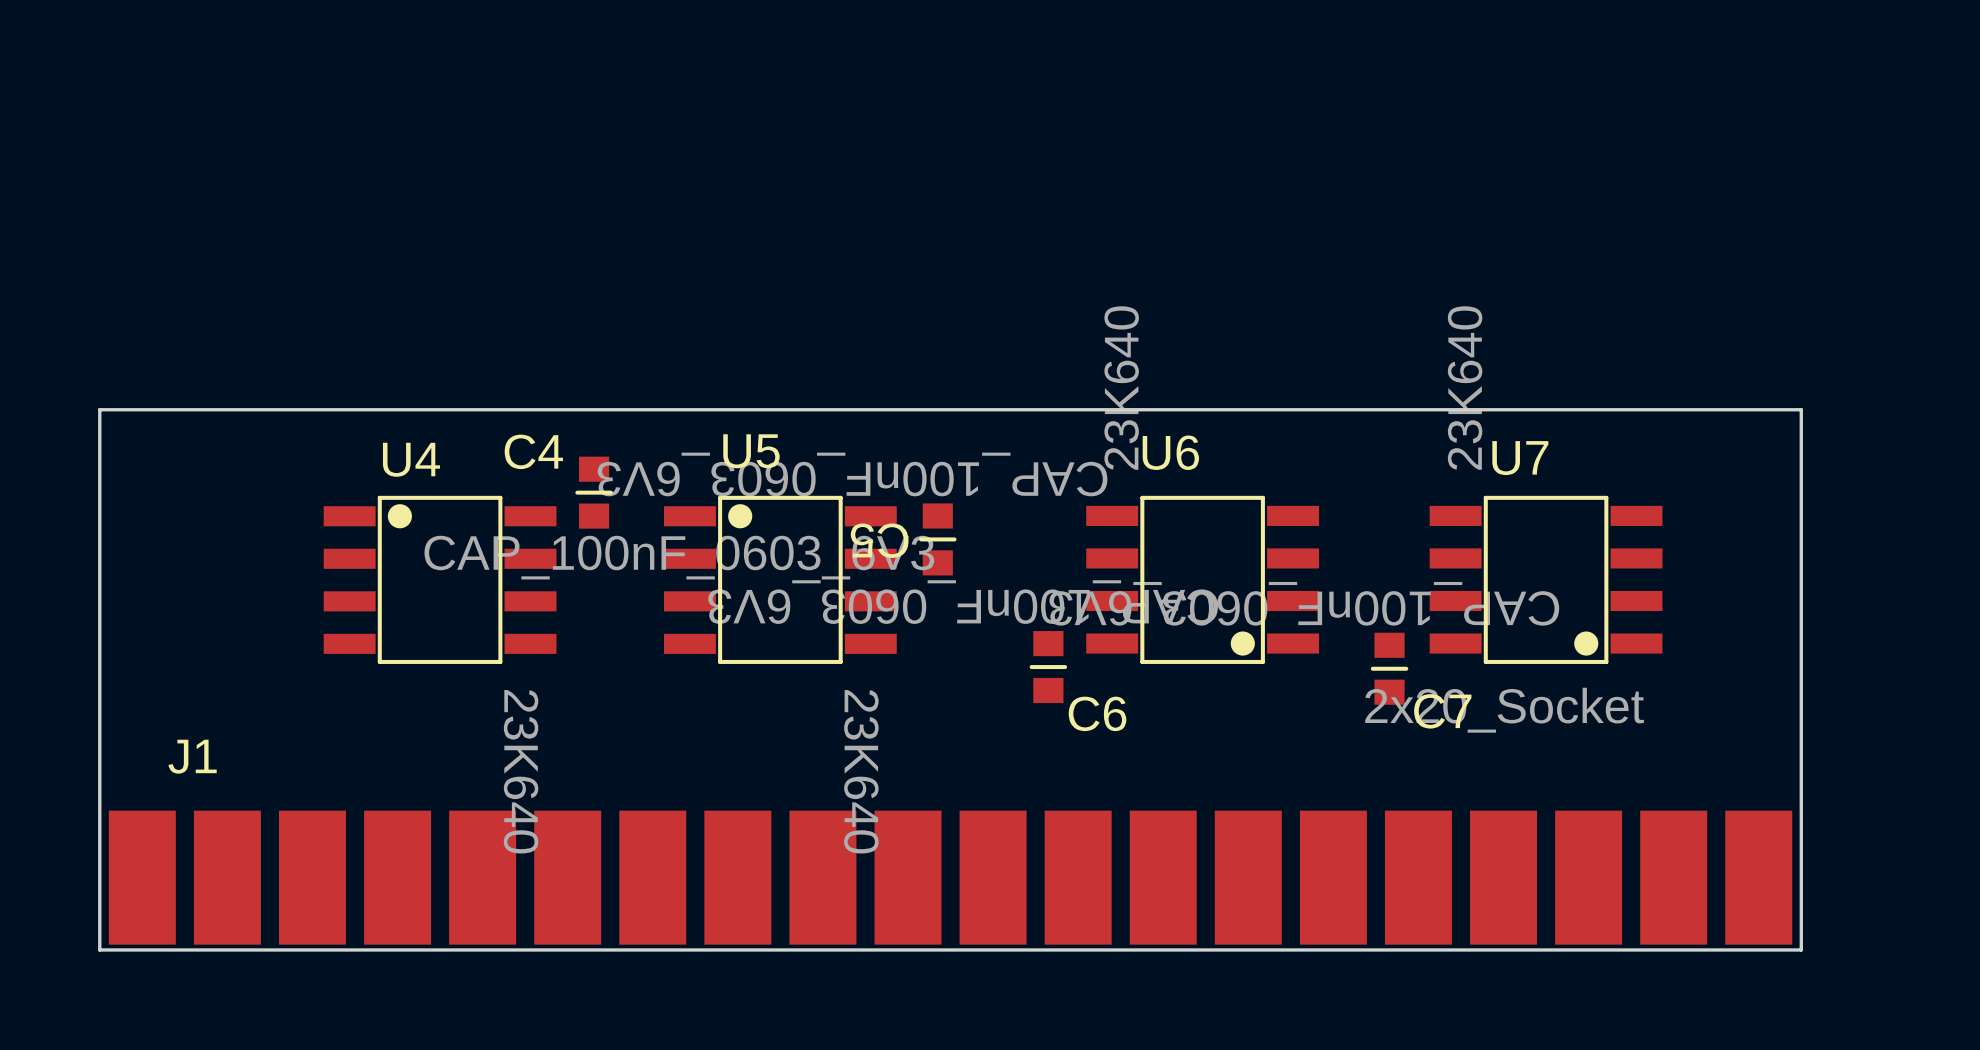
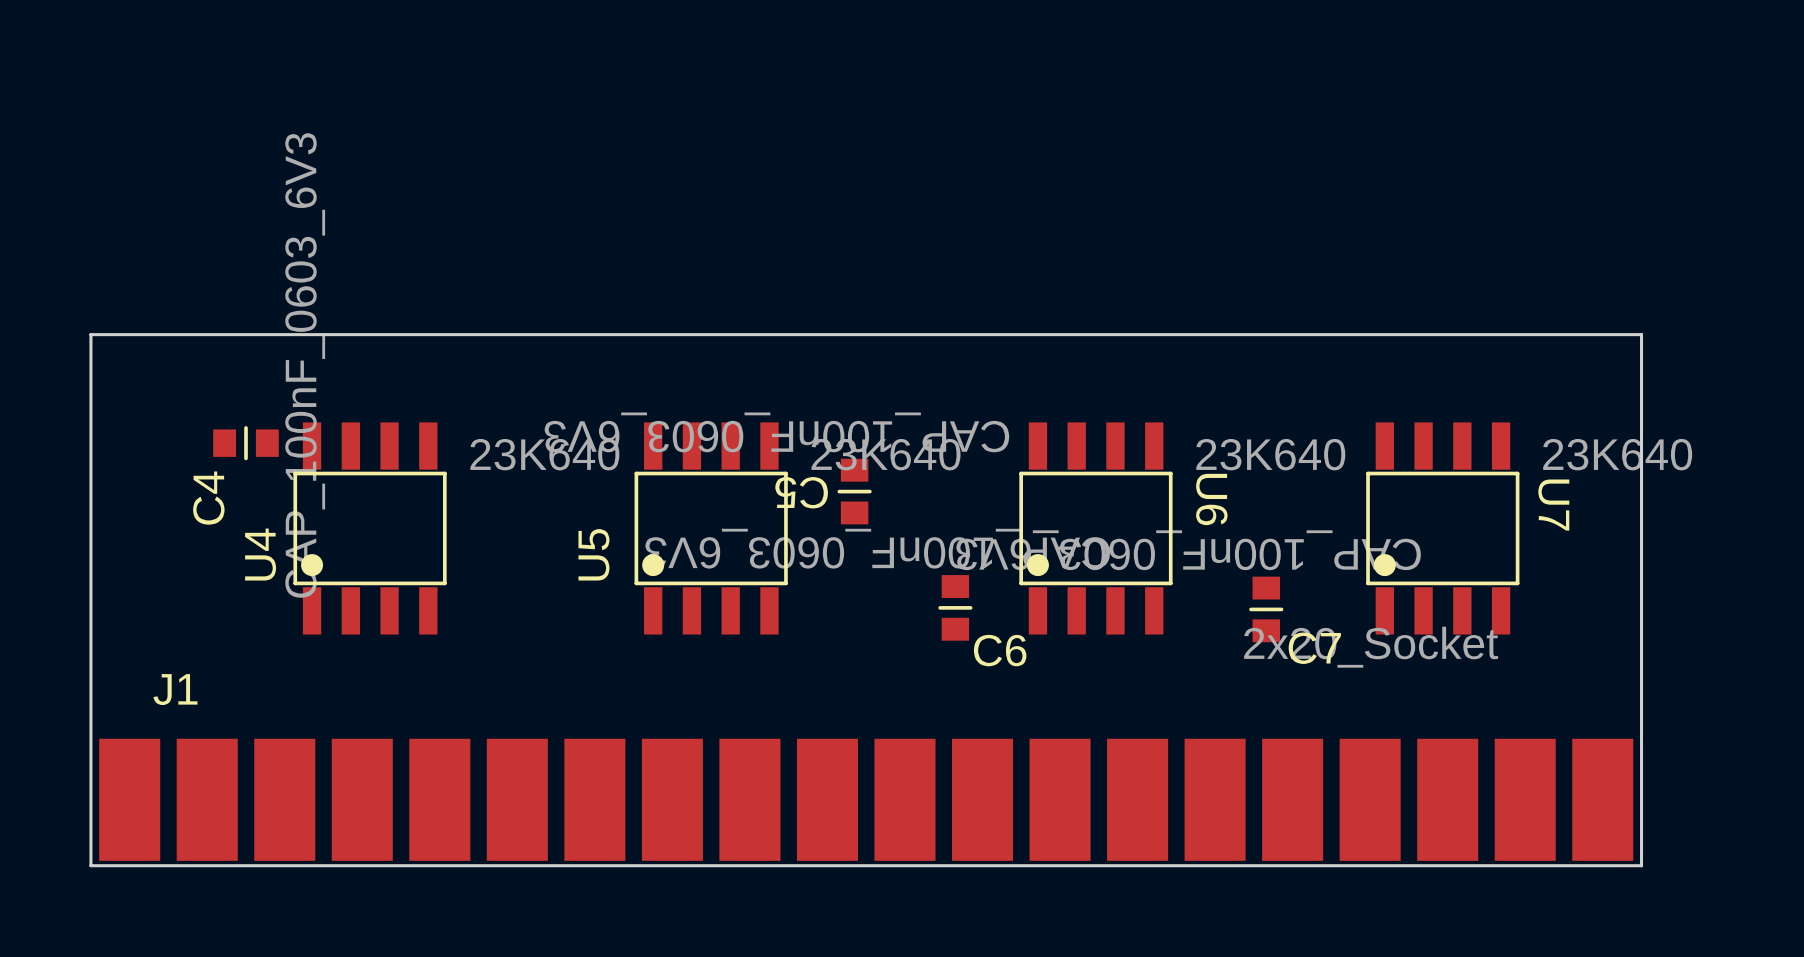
board edge: (99, 409) (1801, 409) -> (90, 373) (90, 334) (1641, 334) (1641, 373)
C4 name position: C4 (533, 451) -> C4 (208, 498)
C4 rotation: 0° (594, 492) -> 90° clockwise (245, 443)
C4 position: (594, 492) -> (245, 443)
C4 value position: CAP_100nF_0603_6V3 (679, 557) -> CAP_100nF_0603_6V3 (305, 365)
U4 rotation: 0° (440, 579) -> 90° counterclockwise (370, 528)
U5 rotation: 0° (780, 579) -> 90° counterclockwise (711, 528)
U6 rotation: 0° (1202, 579) -> 90° clockwise (1095, 528)
U7 rotation: 0° (1546, 579) -> 90° clockwise (1442, 528)

